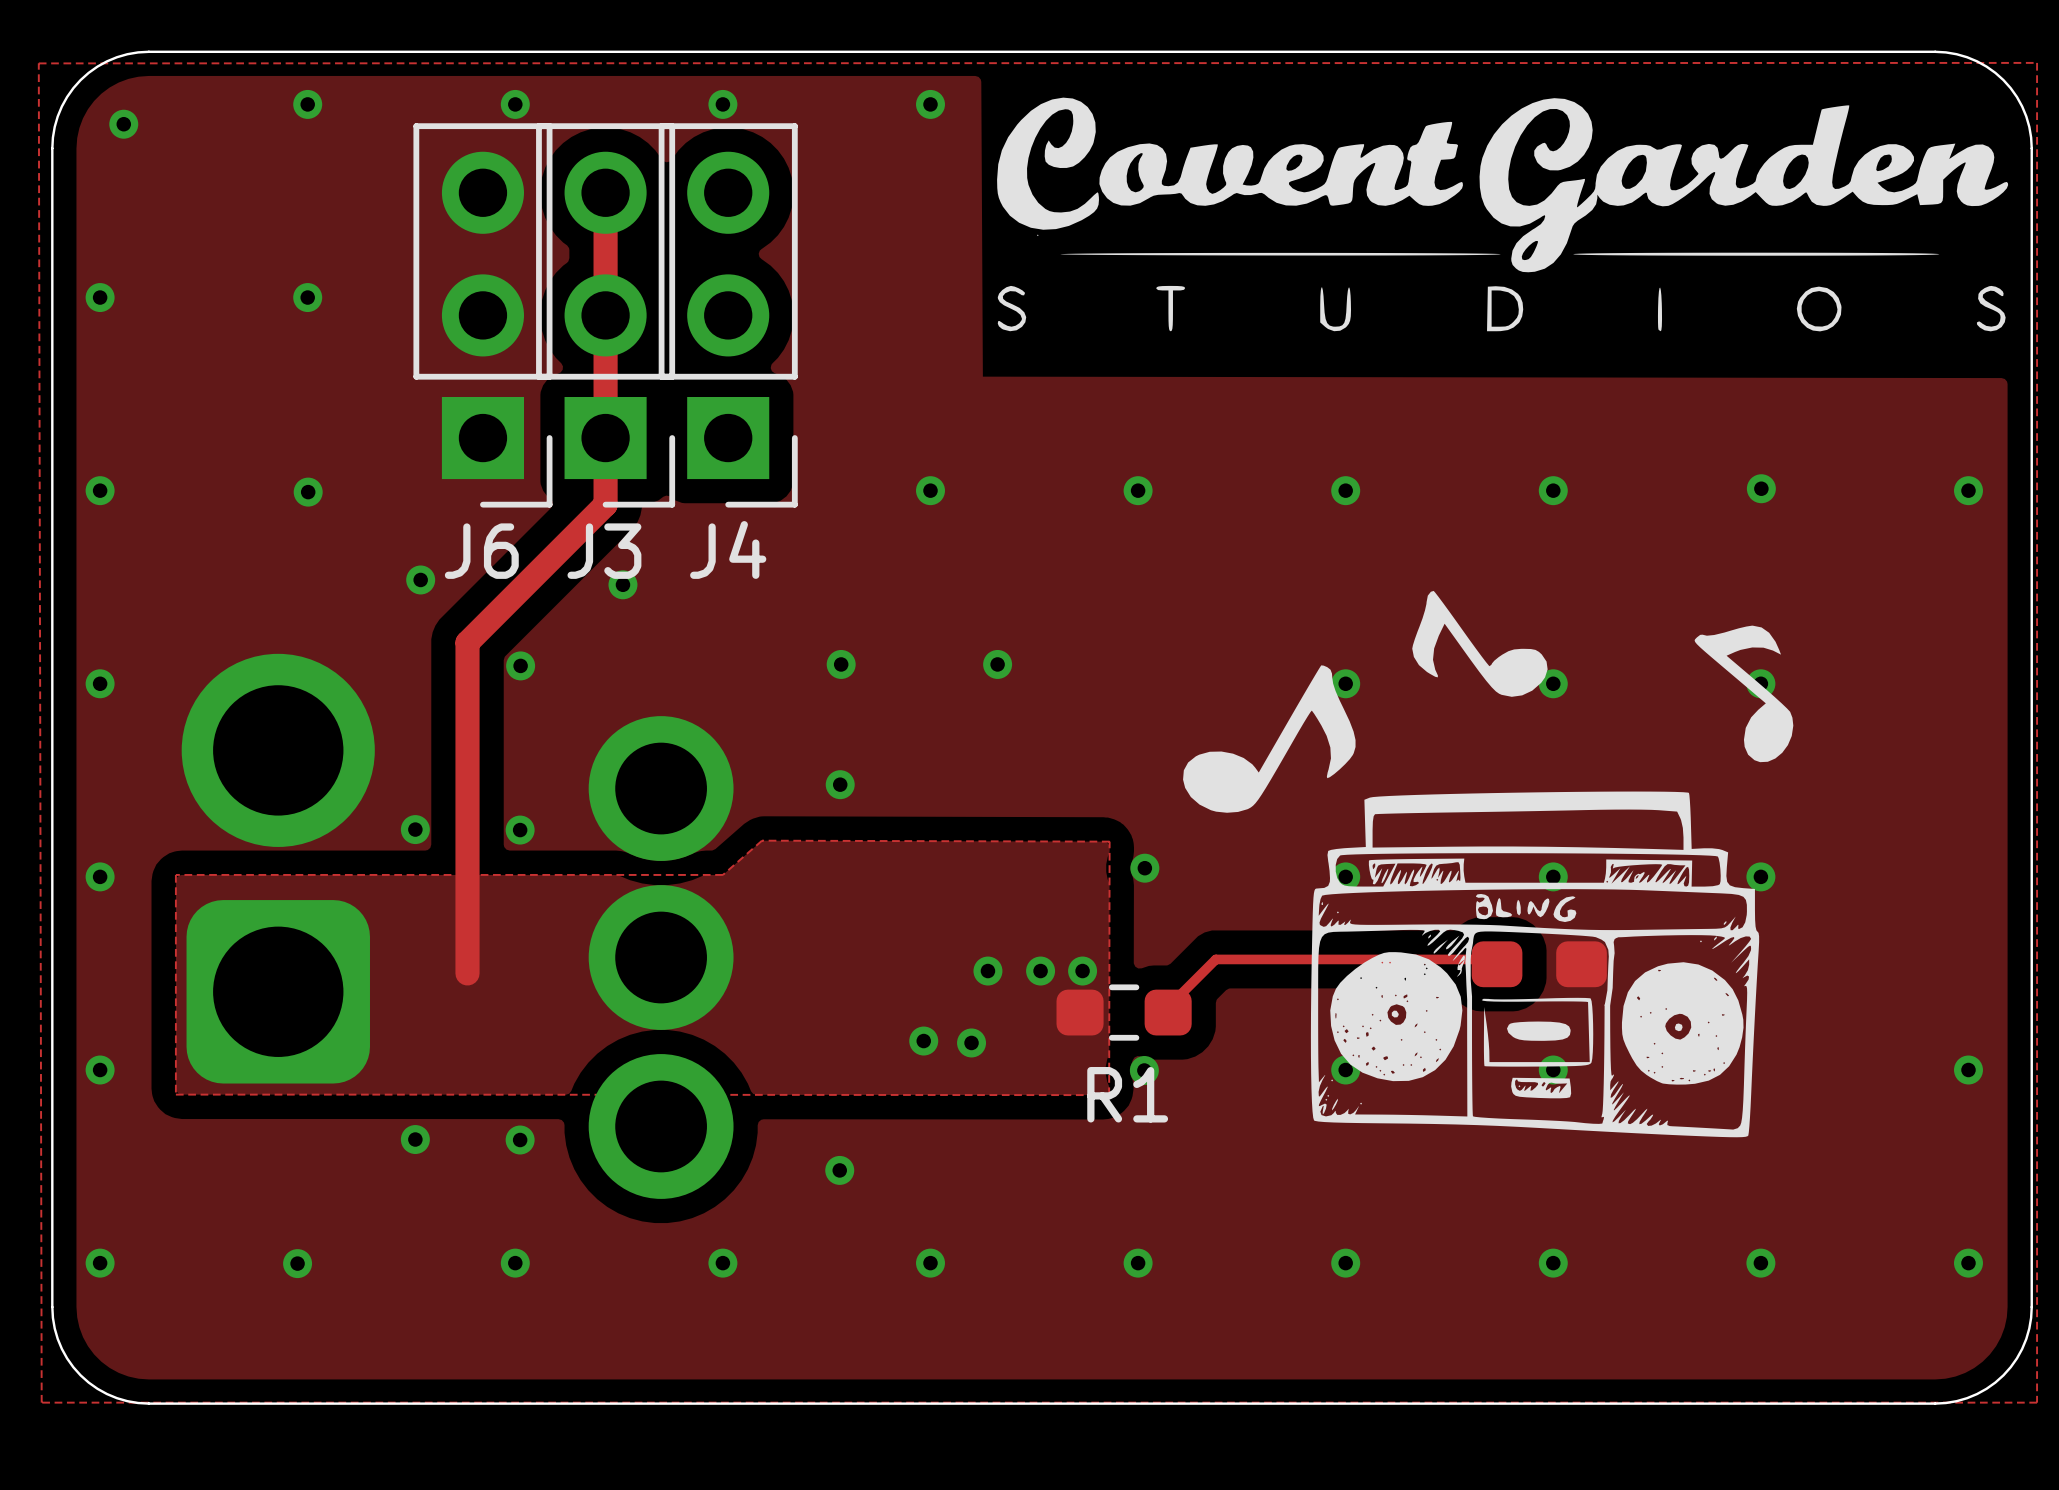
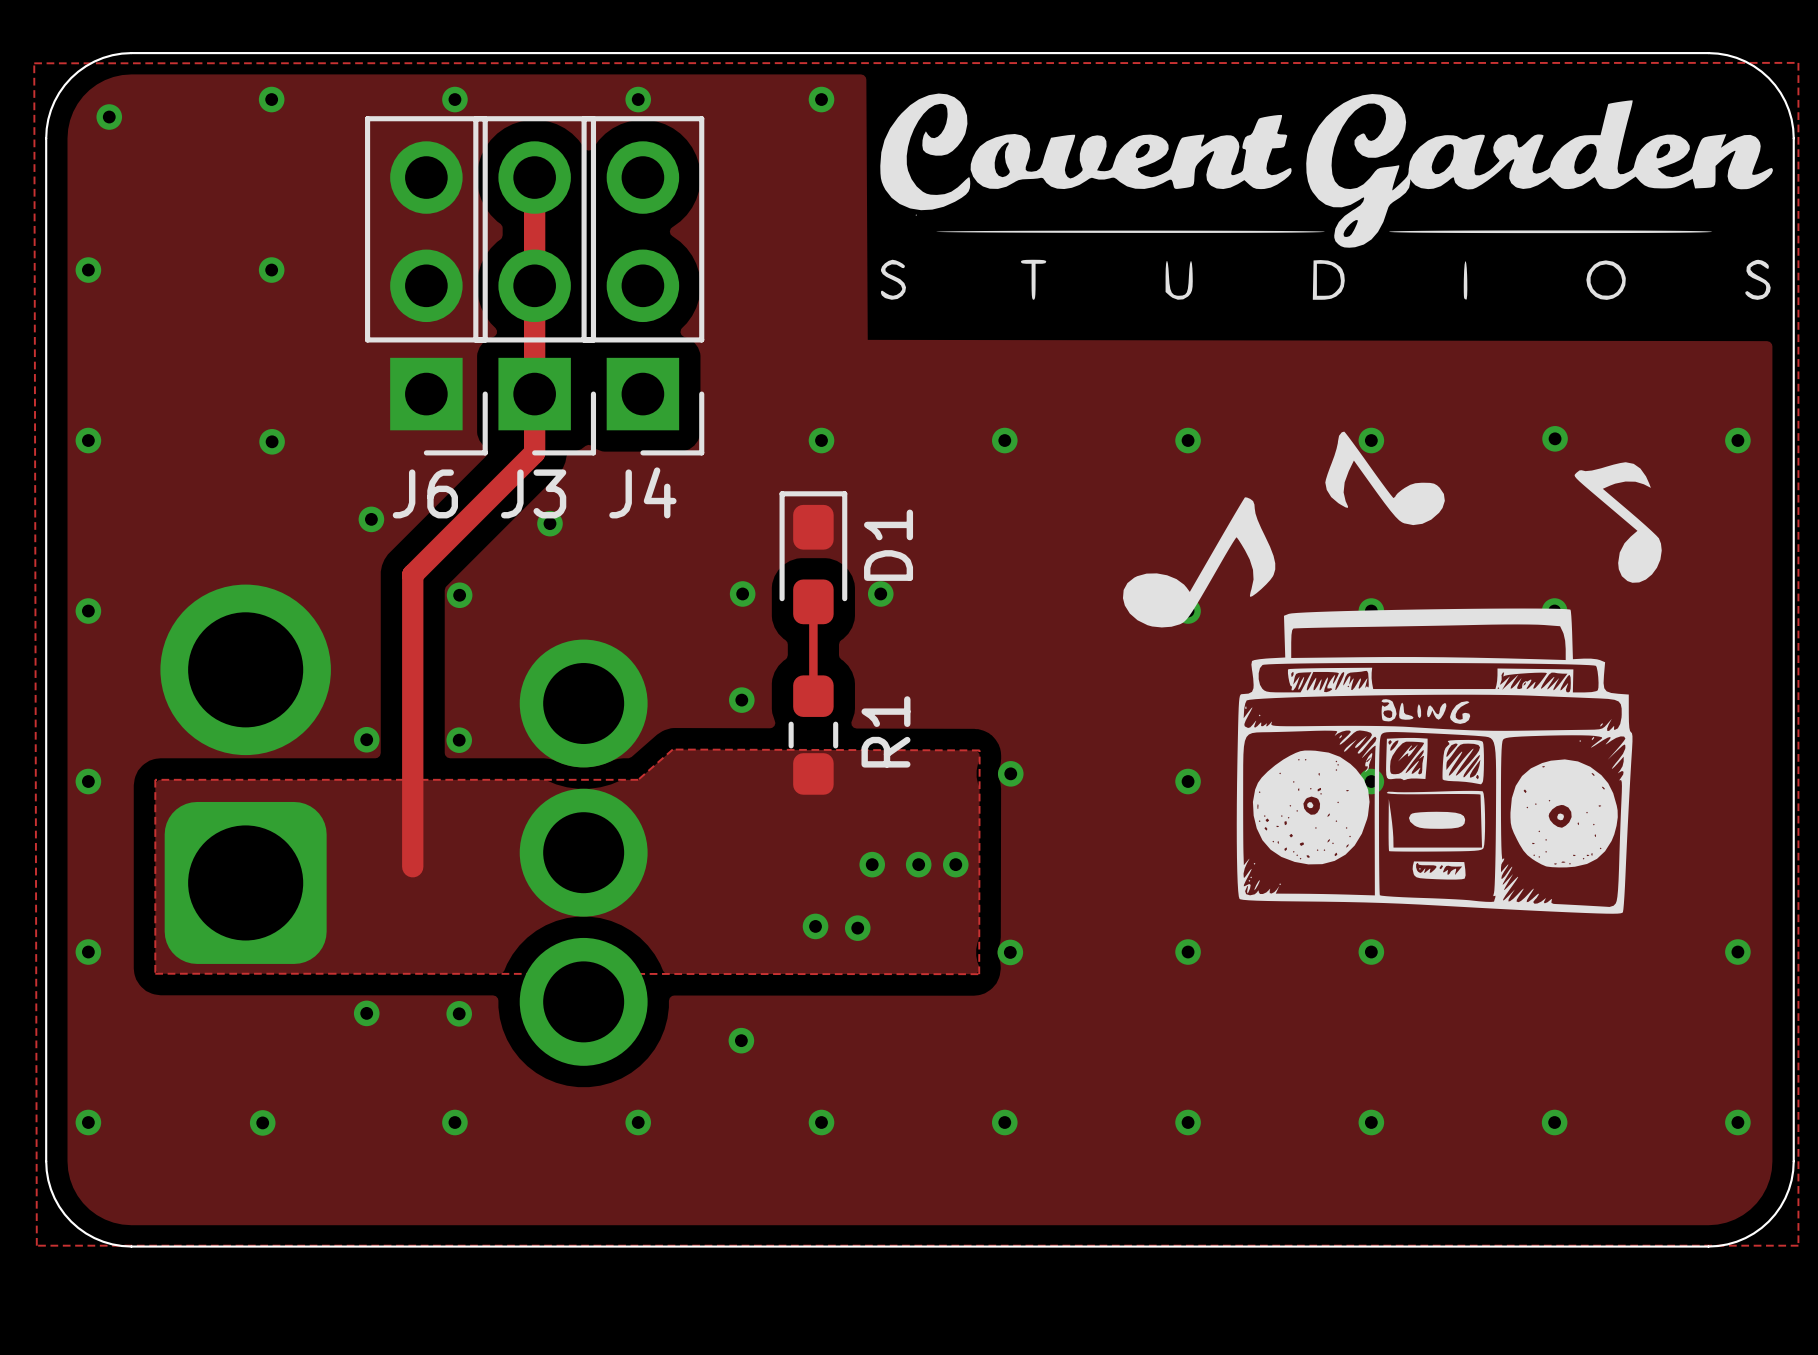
drawing: none -> [1122, 431, 1662, 914]
D1: none -> (813, 557)
track: none -> (813, 601) (813, 696)
part: (1488, 864) -> none
track: (1497, 964) (1492, 959) (1215, 959) (1168, 1007) (1168, 1012) -> none
R1 rotation: 0° (1124, 1012) -> 90° clockwise (813, 735)
R1 position: (1124, 1012) -> (813, 735)
R1 name position: R1 (1127, 1094) -> R1 (885, 731)

